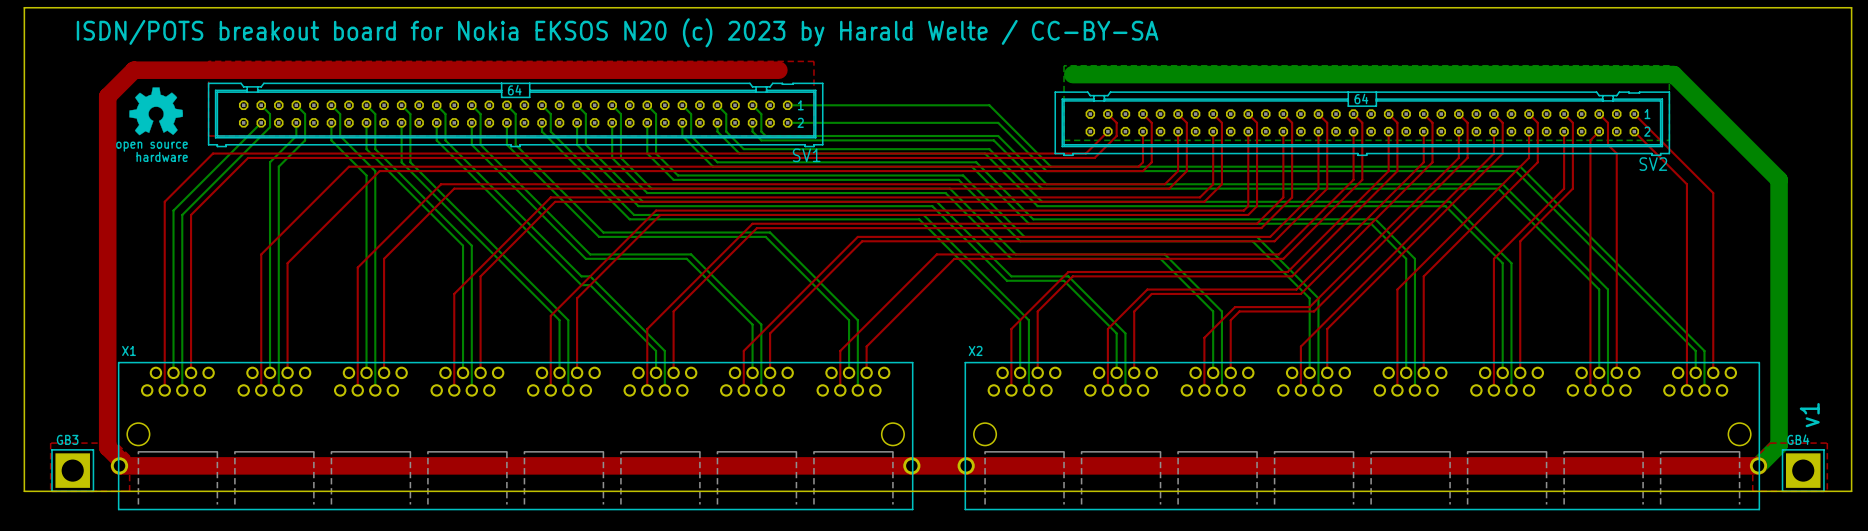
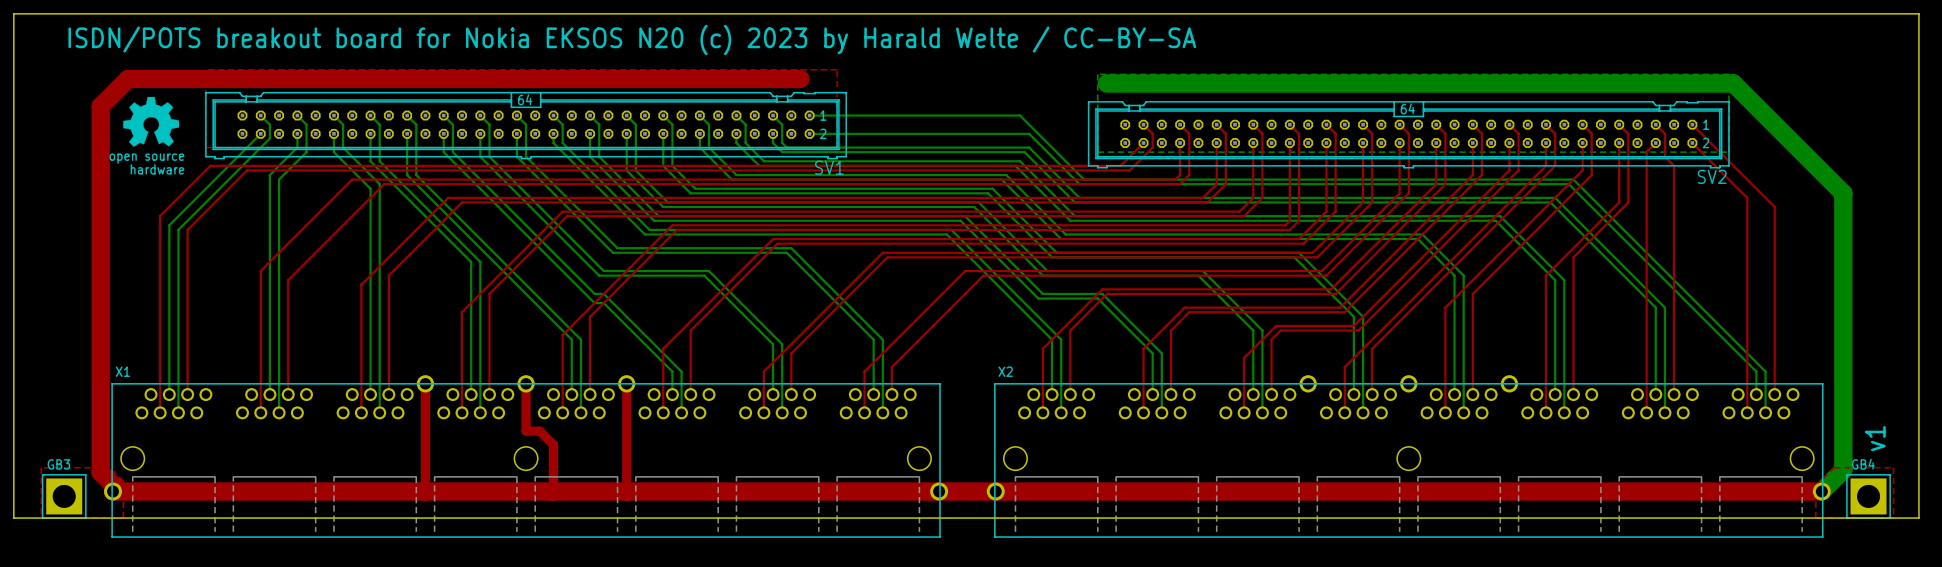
X1 footprint: [110, 362, 921, 510] -> [104, 375, 949, 538]
top track: none -> (425, 383) (425, 491)
top track: none -> (526, 383) (526, 431) (539, 431) (553, 444) (553, 491)
top track: none -> (626, 383) (626, 491)
X2 footprint: [957, 362, 1768, 510] -> [986, 375, 1831, 538]

